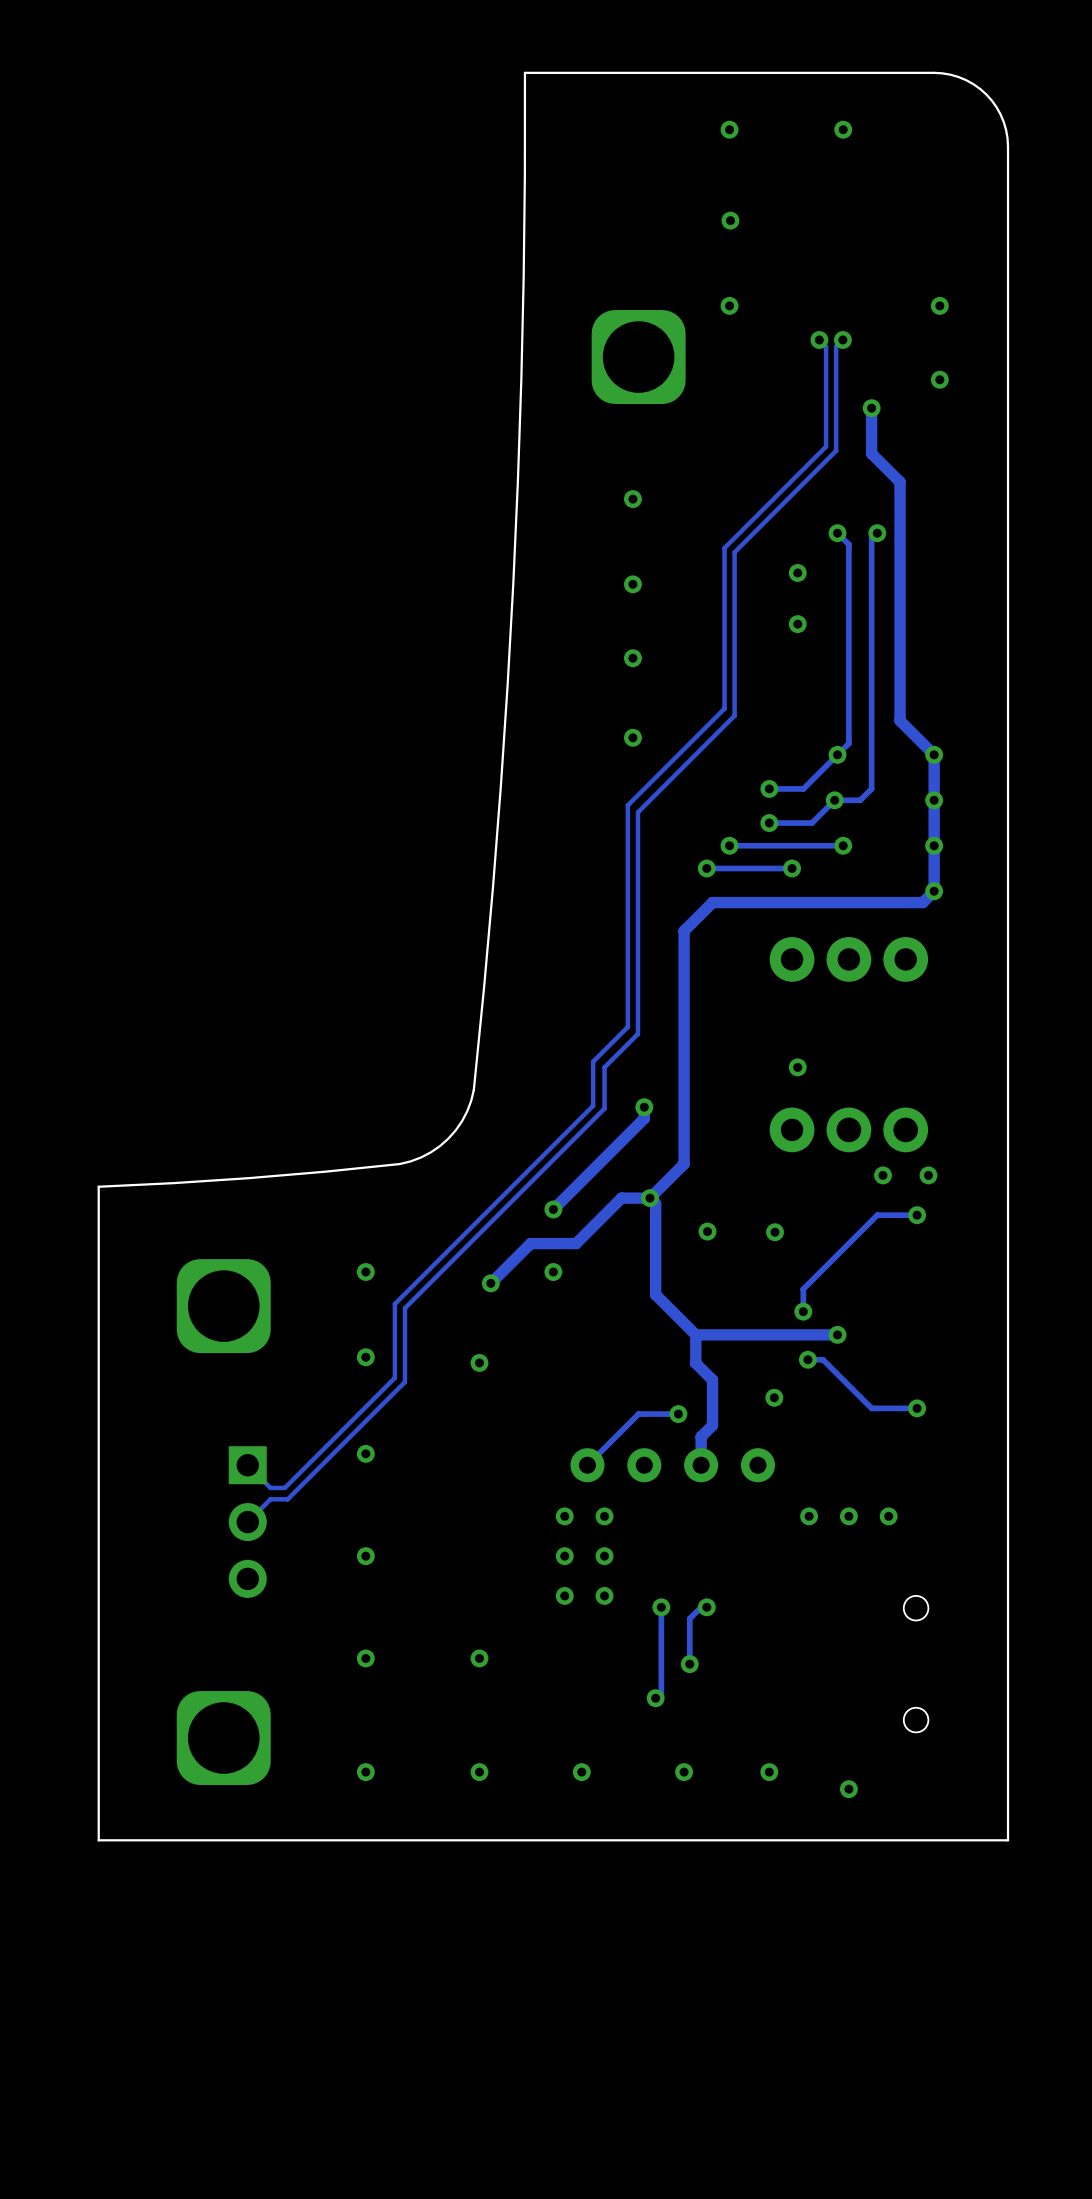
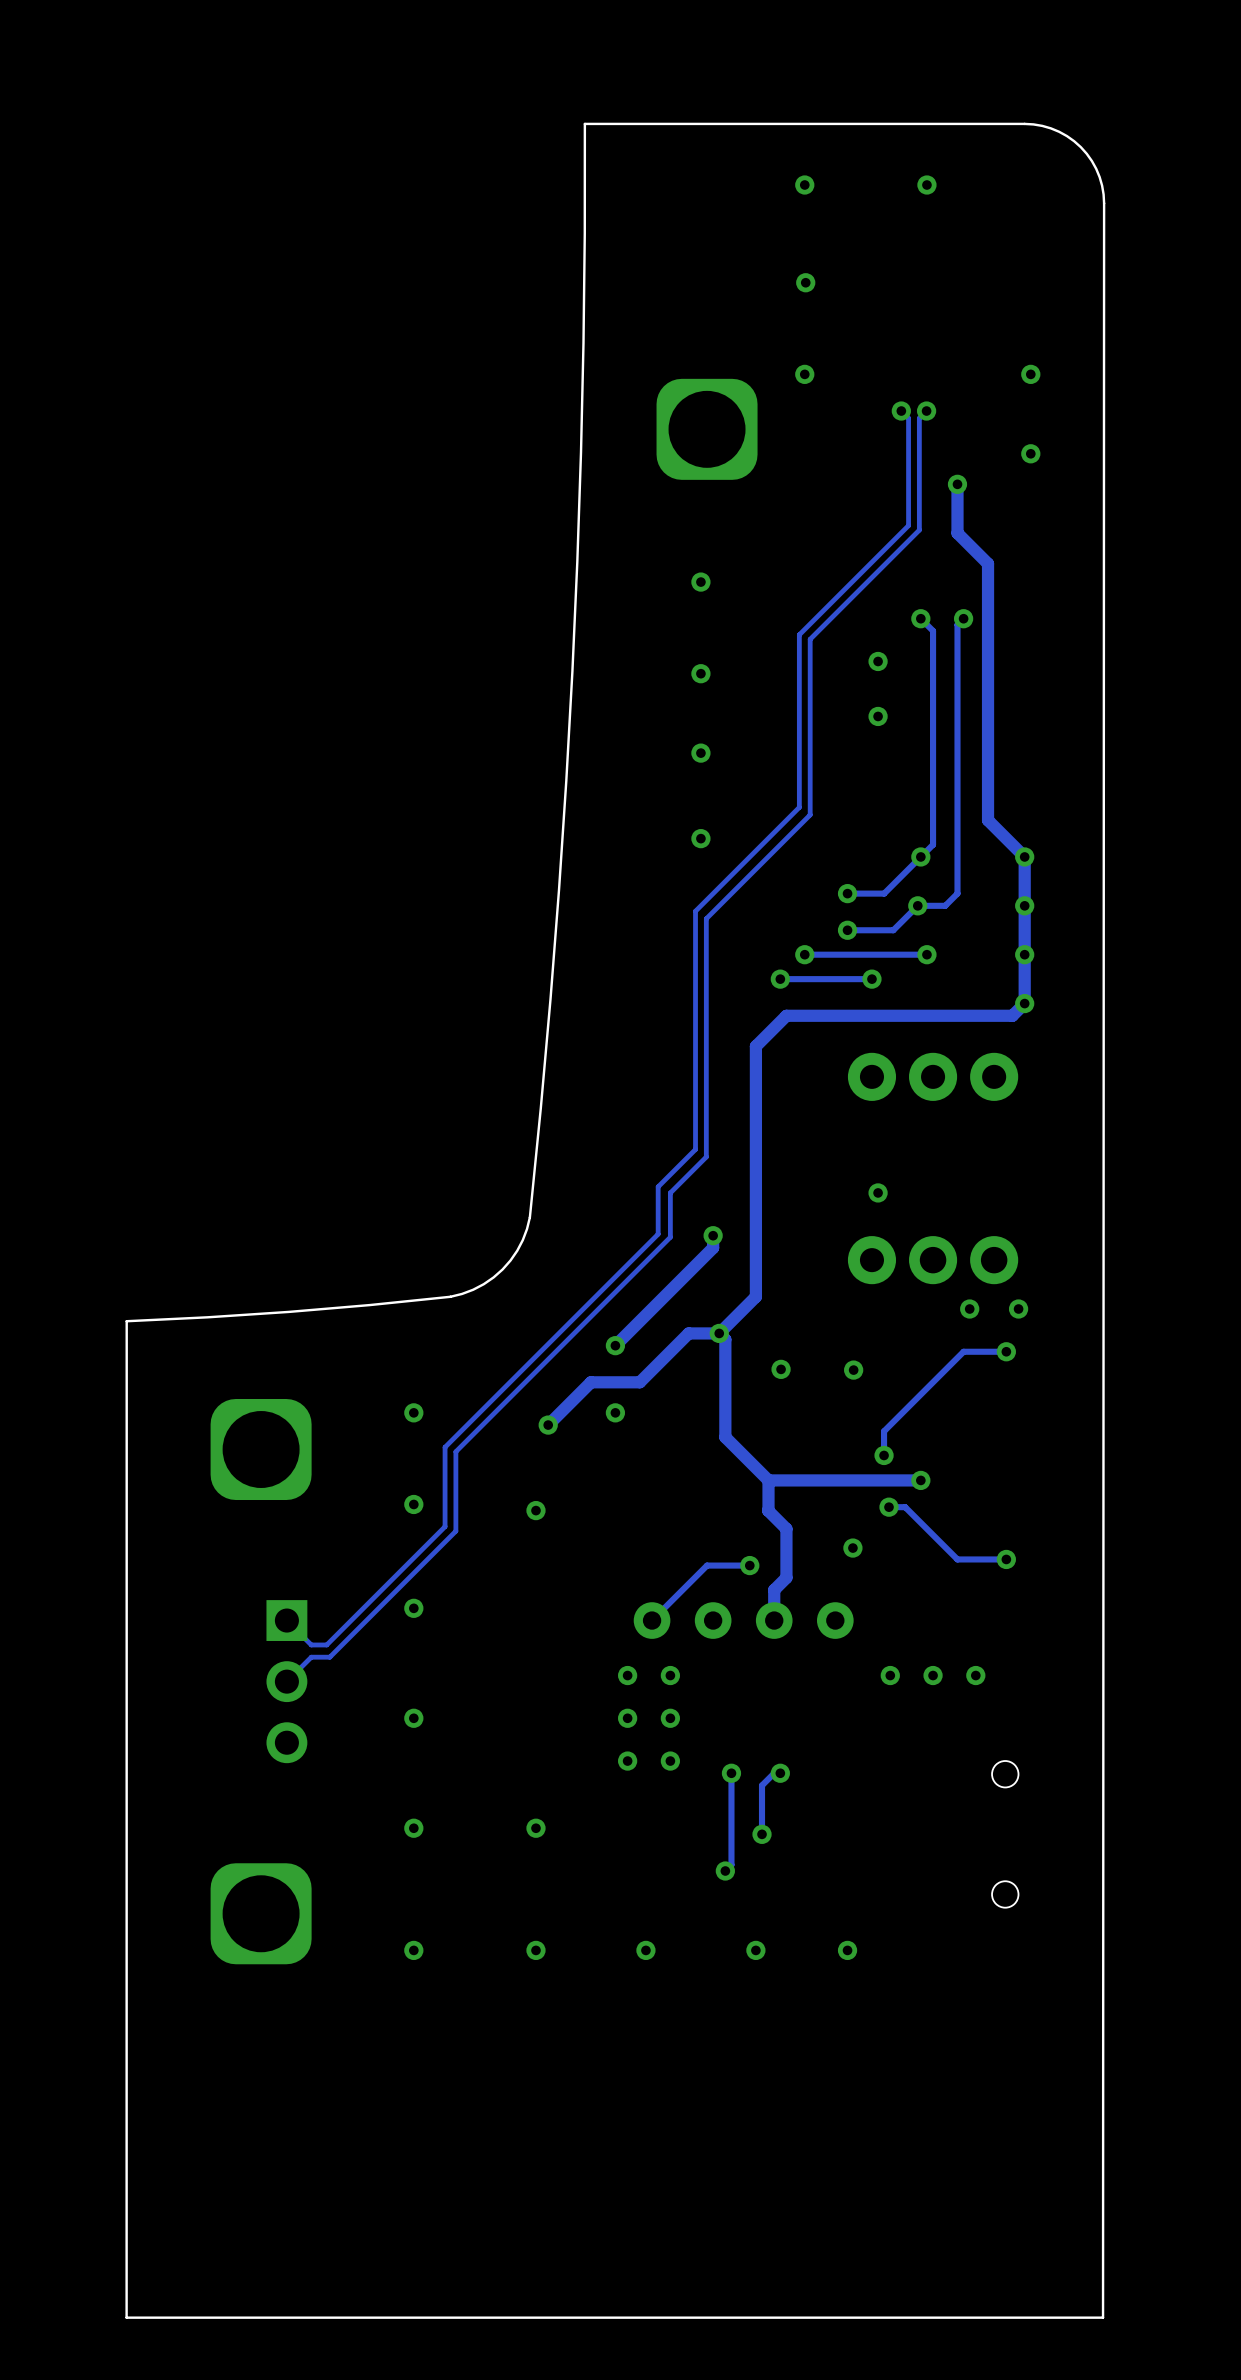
board edge: (1008, 146) (1008, 1840) (98, 1840) (98, 1186) -> (1104, 203) (1103, 2317) (126, 2317) (126, 1321)
via: (848, 1789) -> none

